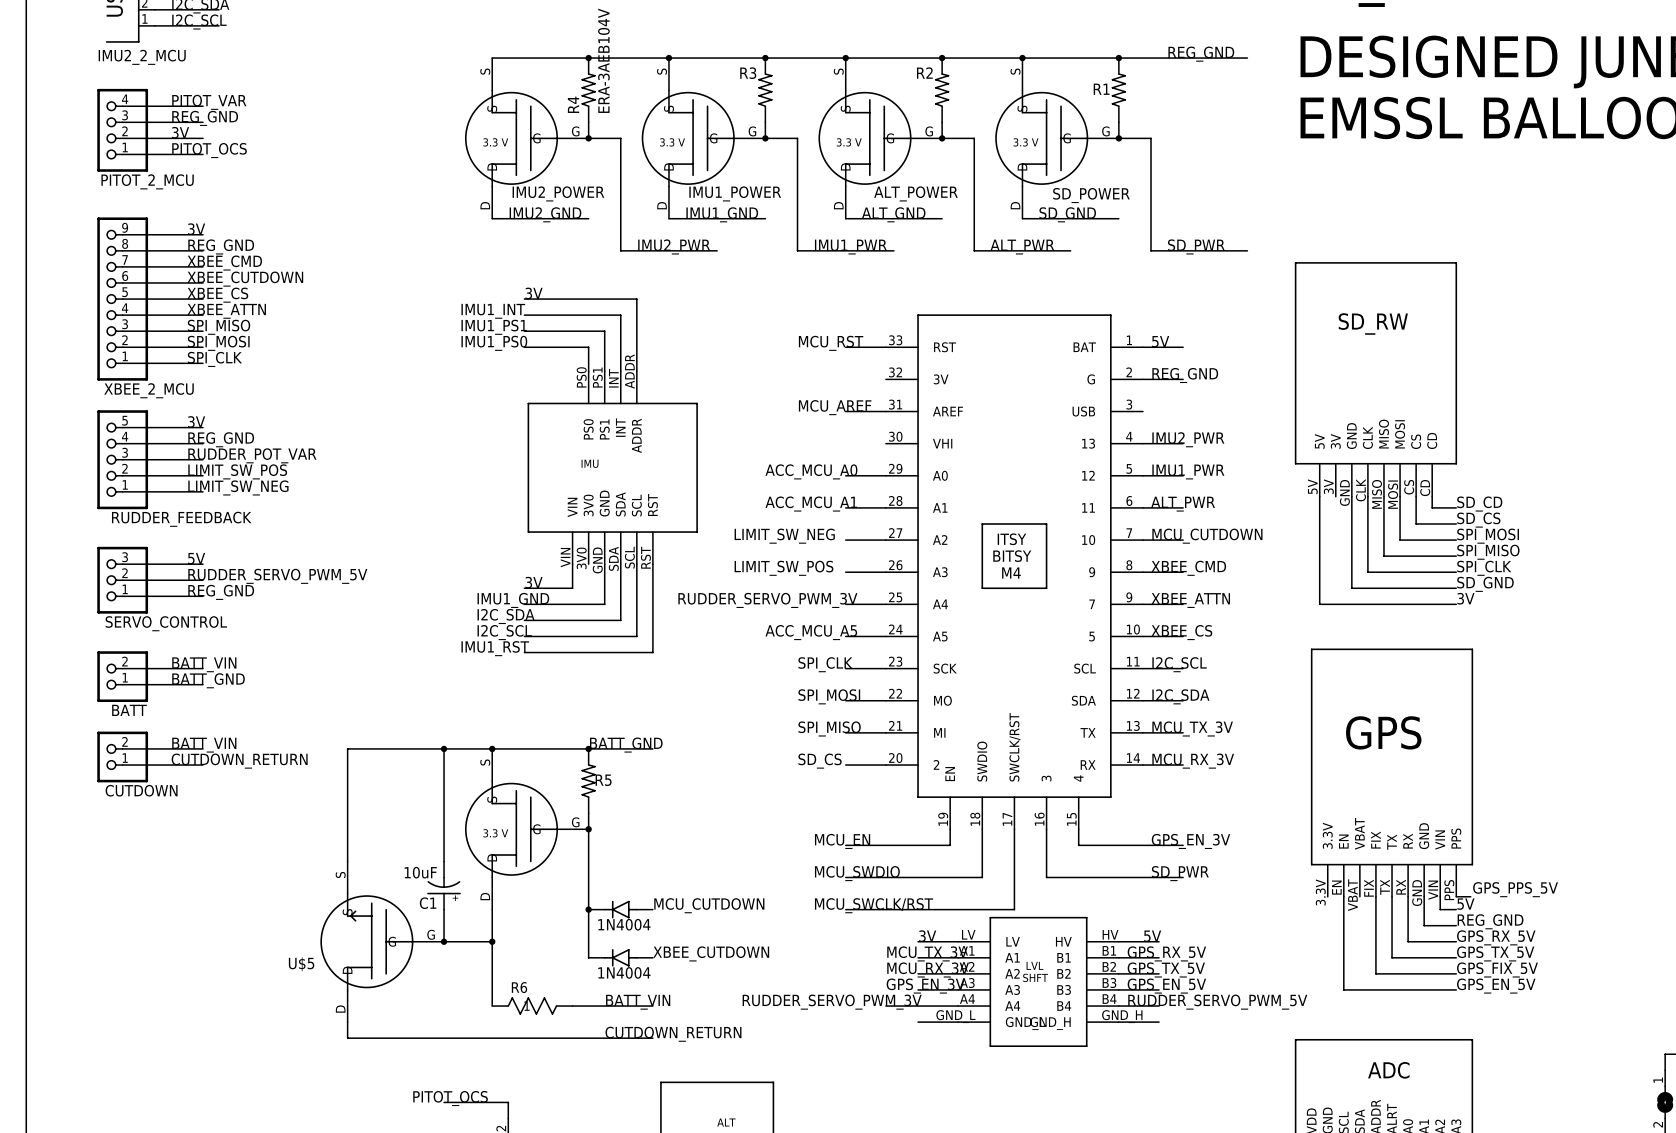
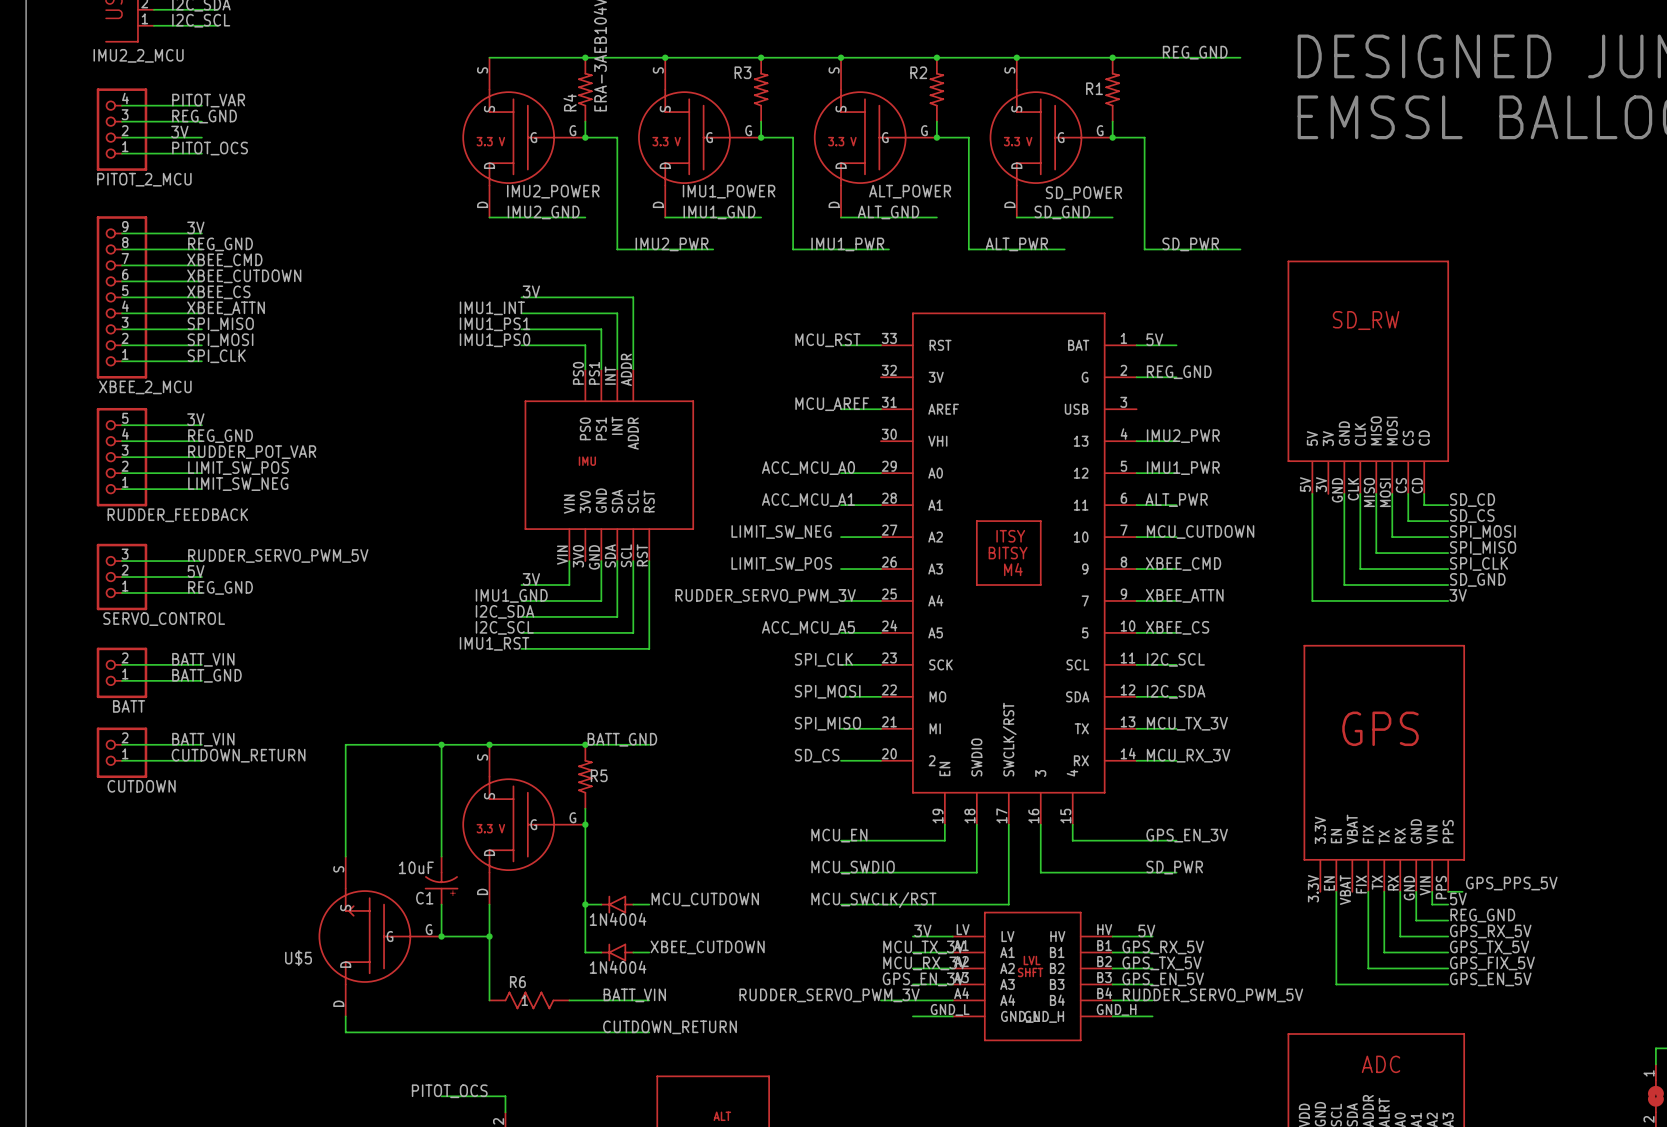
label: 5V (196, 558) -> RUDDER_SERVO_PWM_5V (278, 555)
label: RUDDER_SERVO_PWM_5V (277, 576) -> 5V (196, 571)

